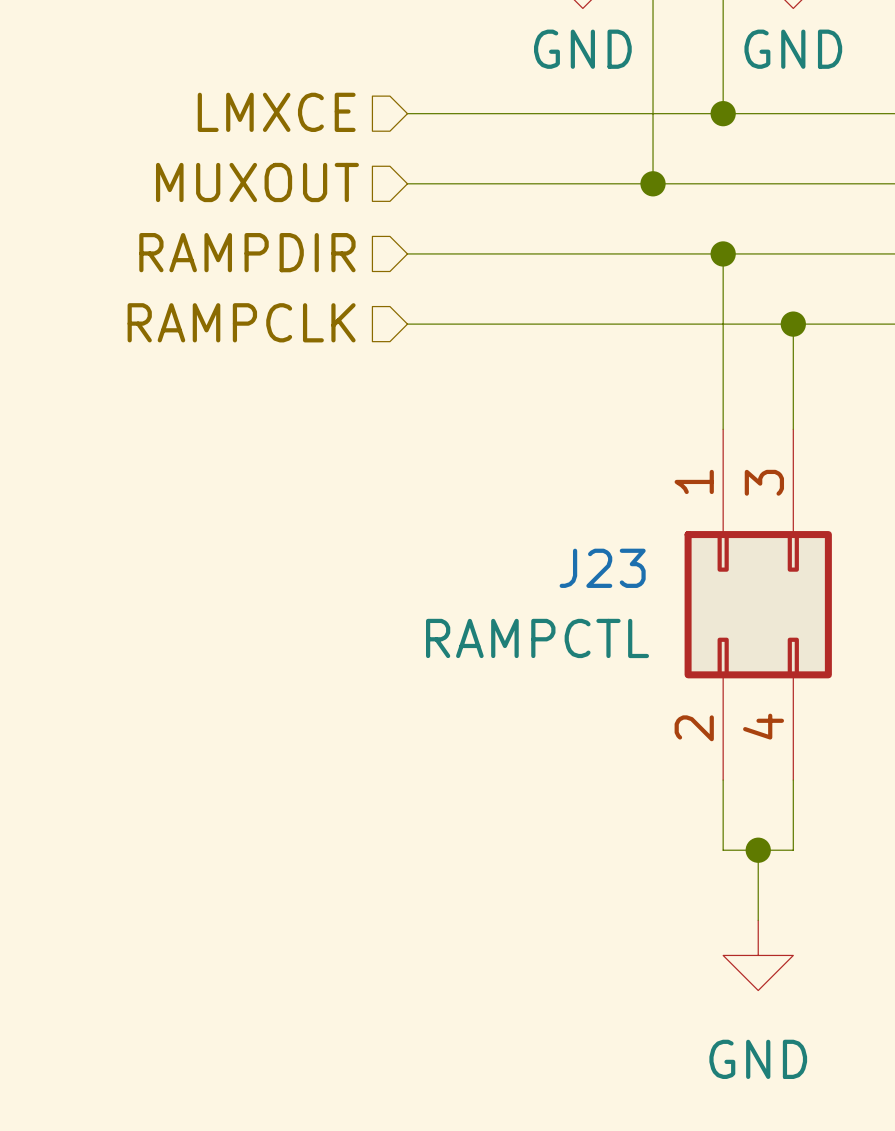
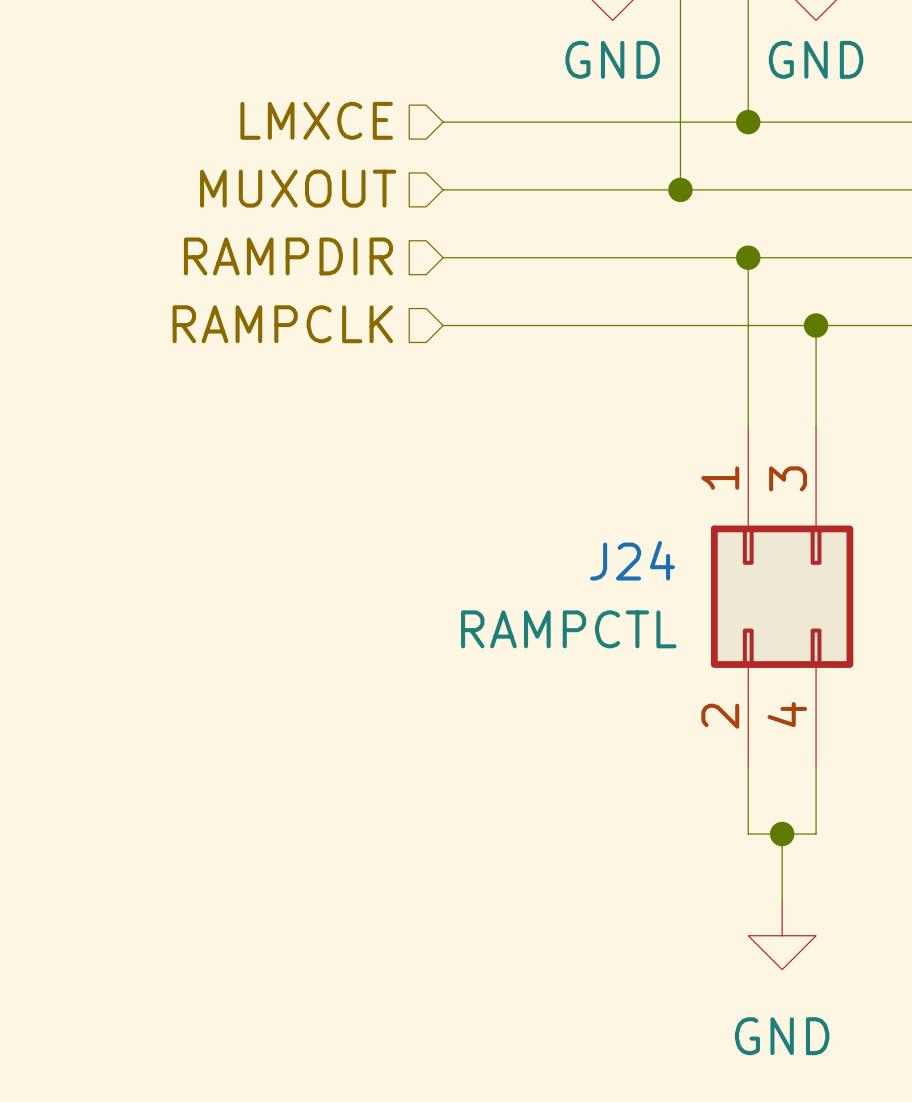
J23 name: J23 (602, 568) -> J24 (632, 560)

